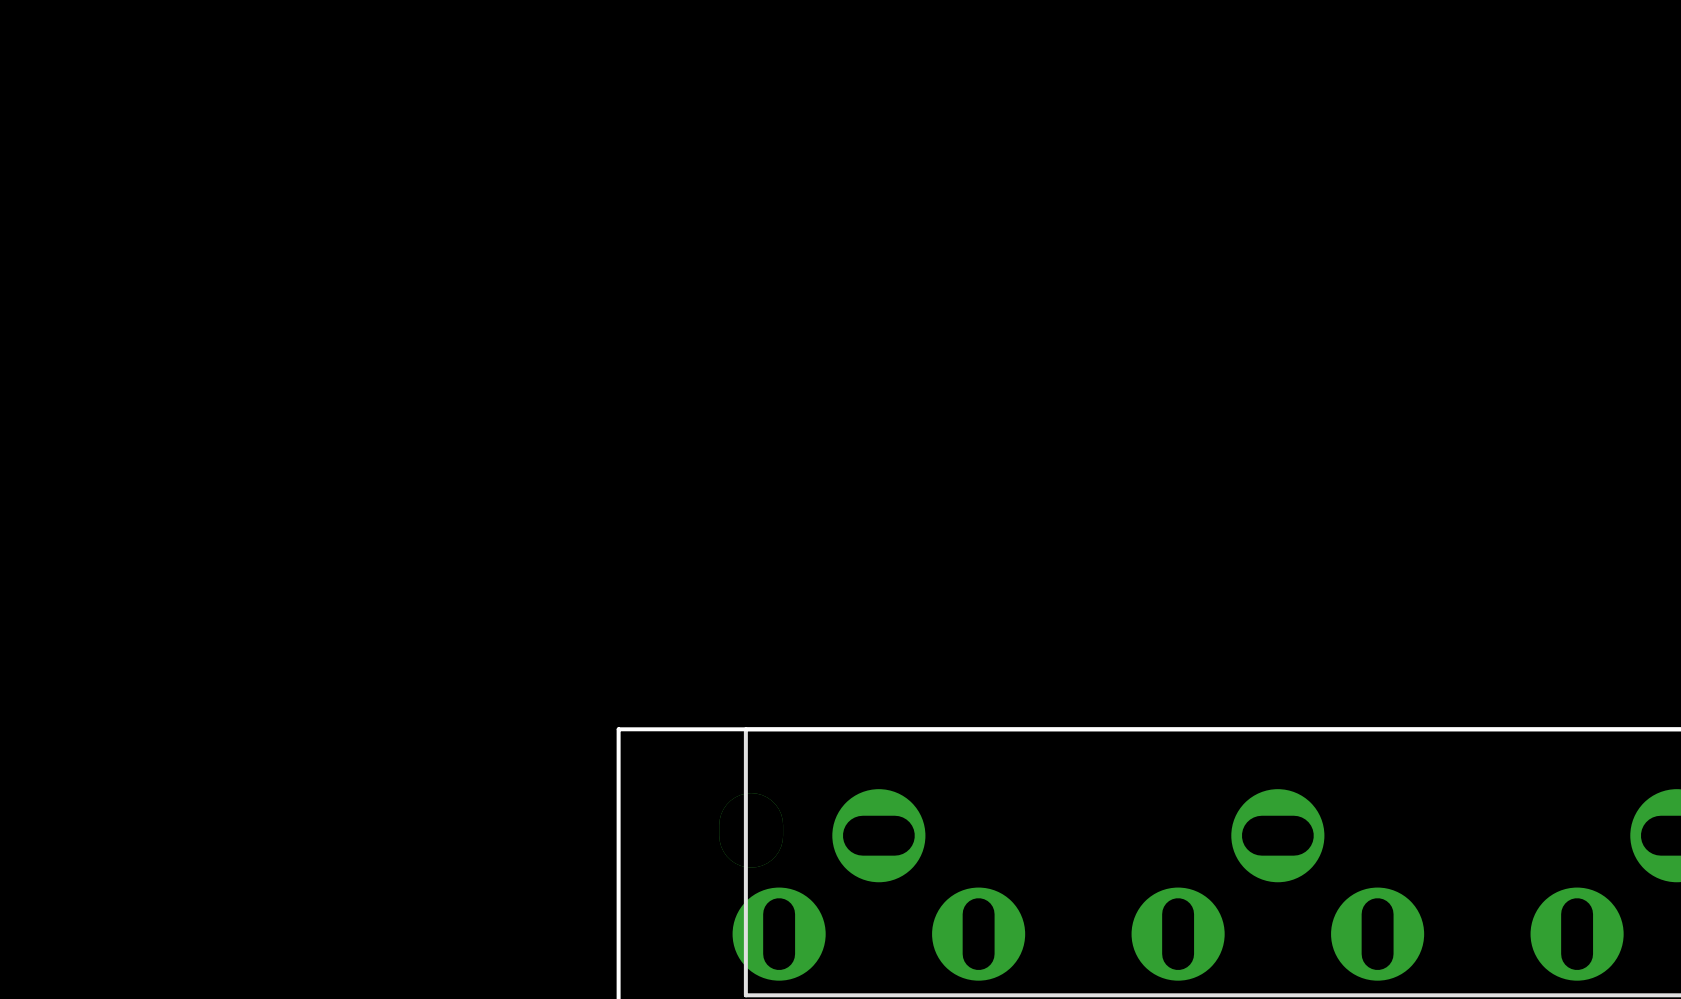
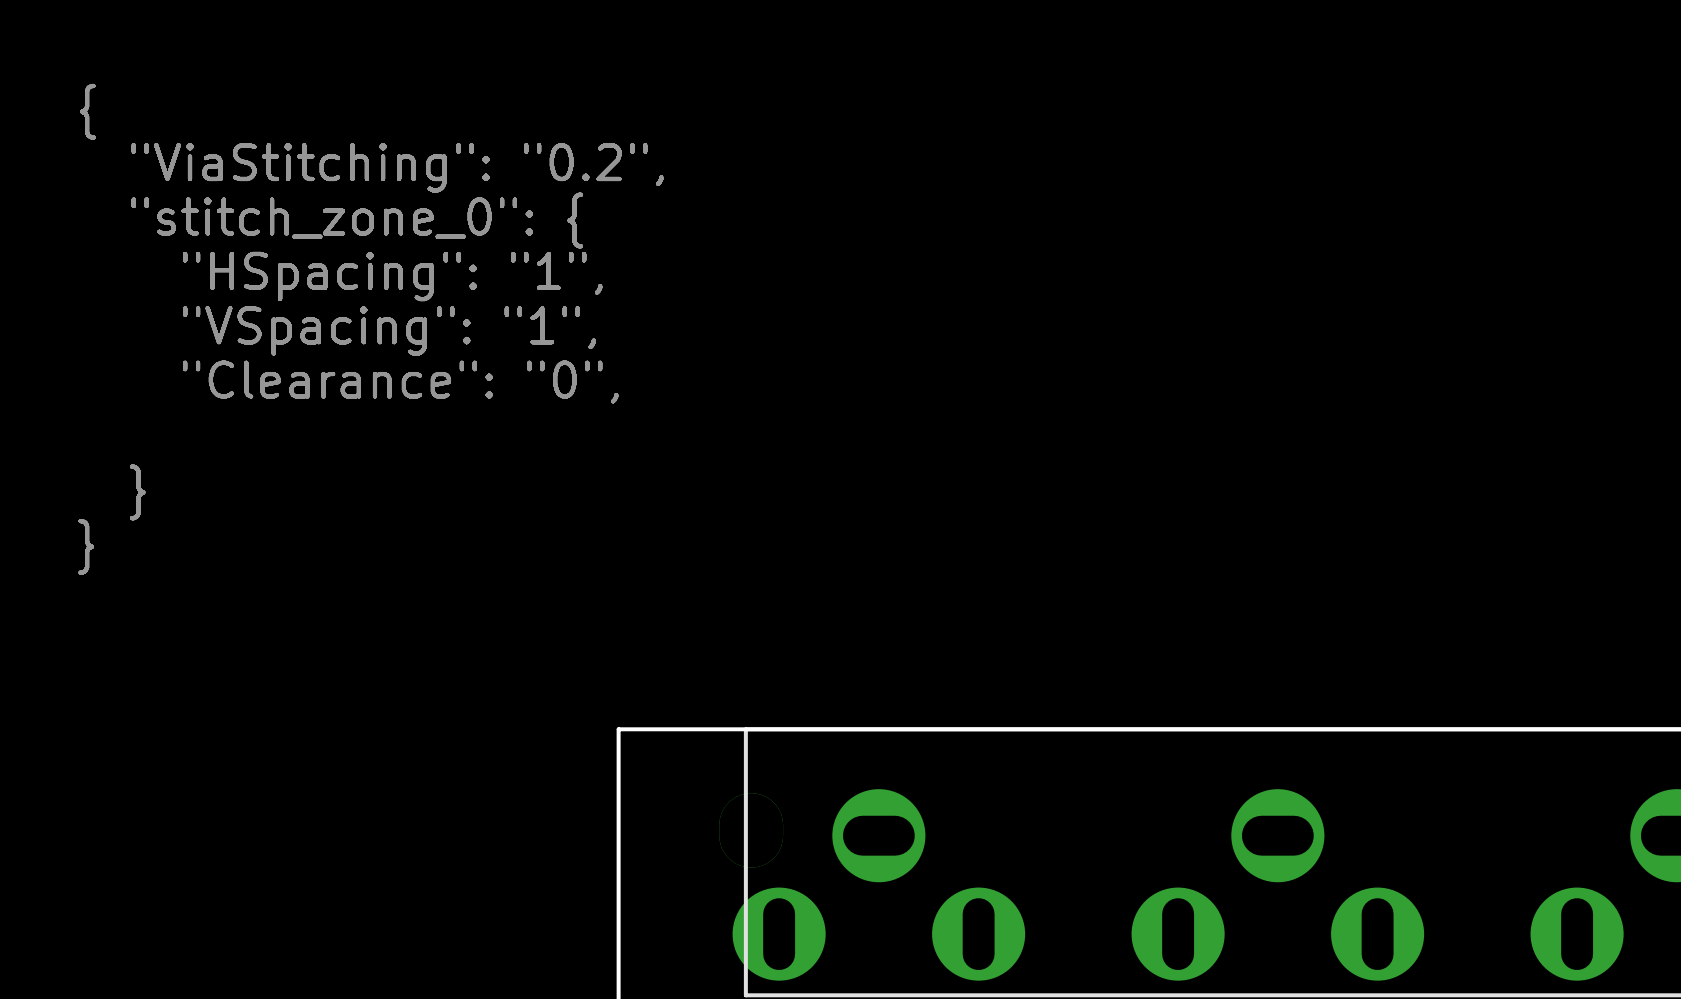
text: none -> { (87, 111)
text: none -> "ViaStitching": "0.2", (397, 167)
text: none -> "stitch_zone_0": { (357, 220)
text: none -> "HSpacing": "1", (392, 276)
text: none -> "VSpacing": "1", (389, 330)
text: none -> "Clearance": "0", (400, 382)
text: none -> } (137, 492)
text: none -> } (86, 546)

